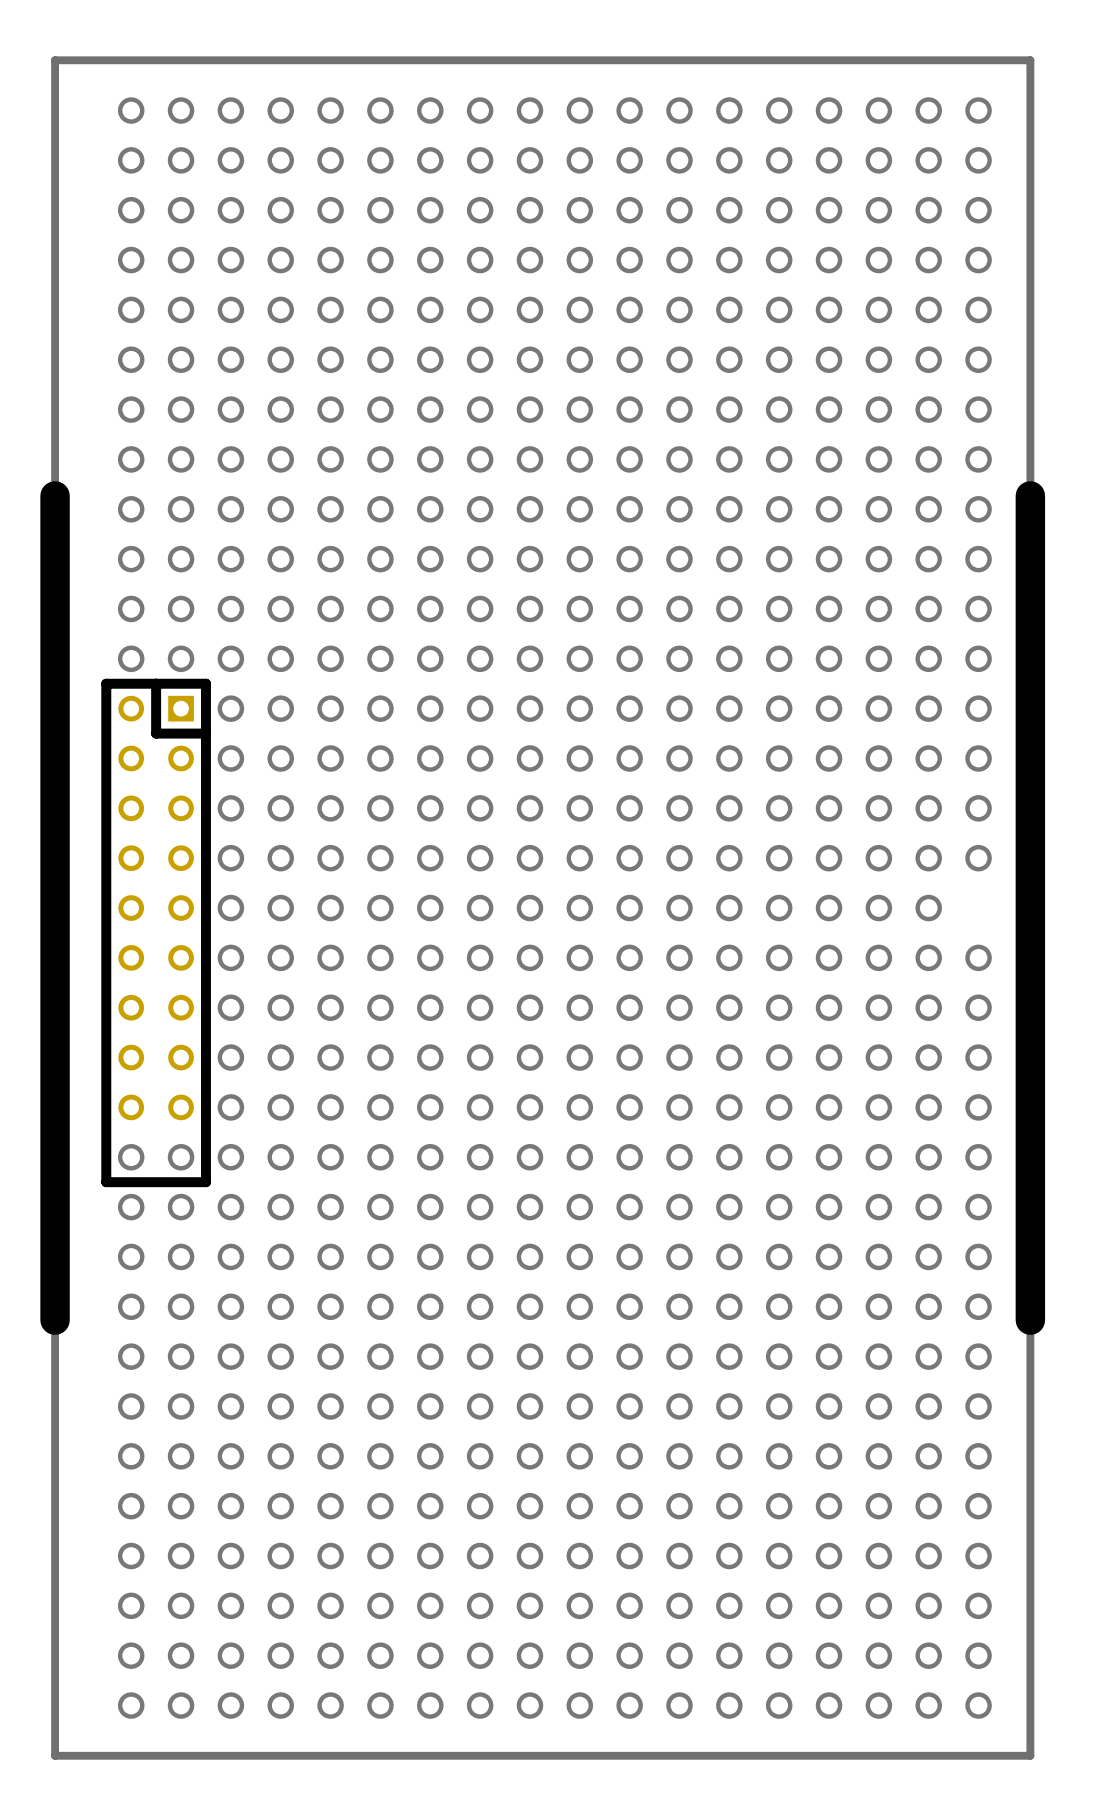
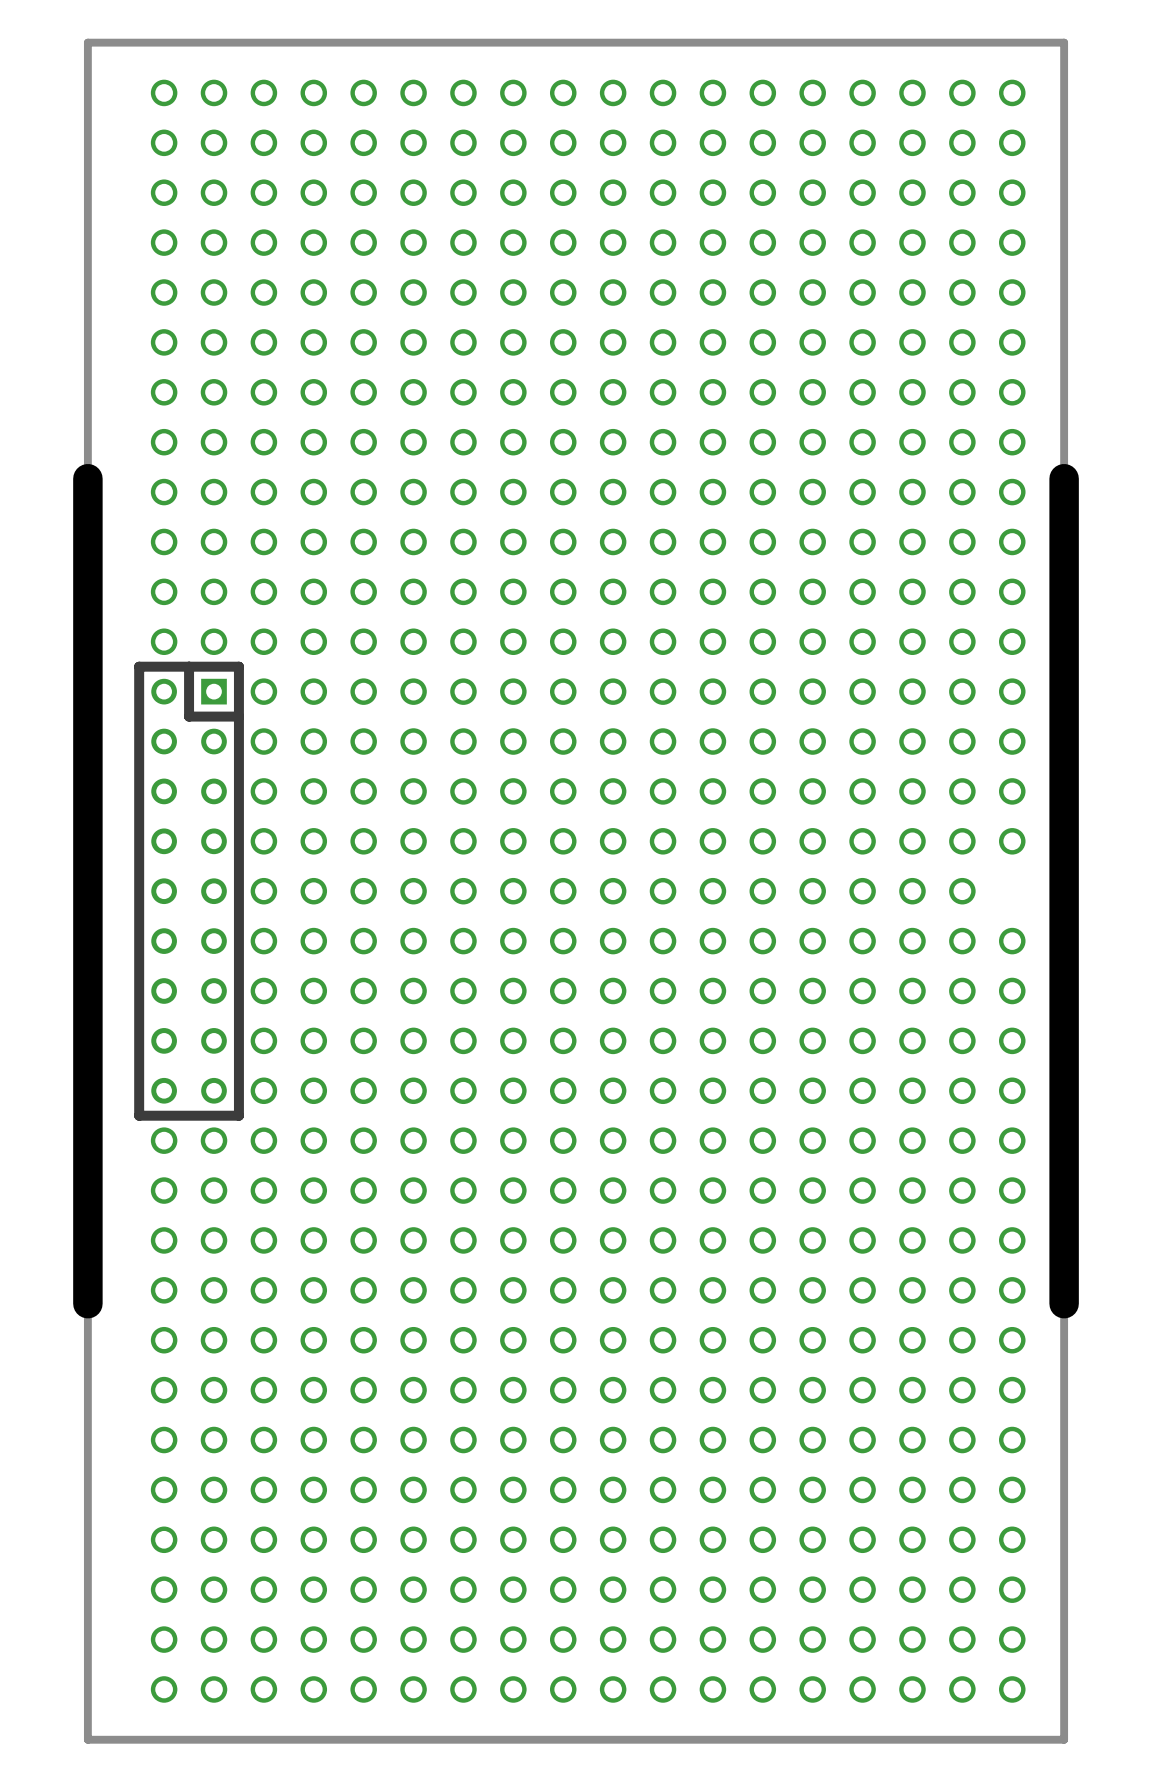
line: (106, 1132) (106, 1182) (205, 1182) (205, 1132) -> (139, 1115) (238, 1115)

